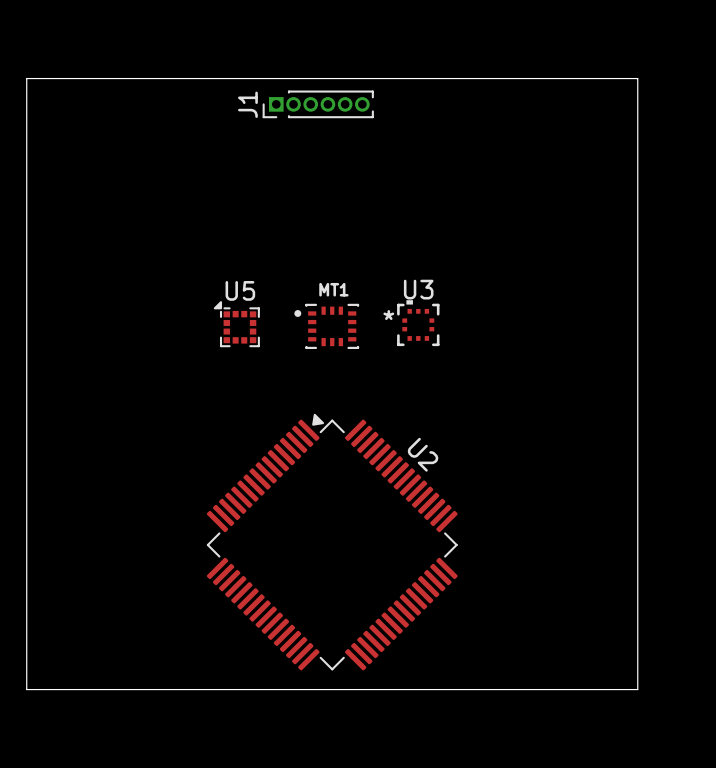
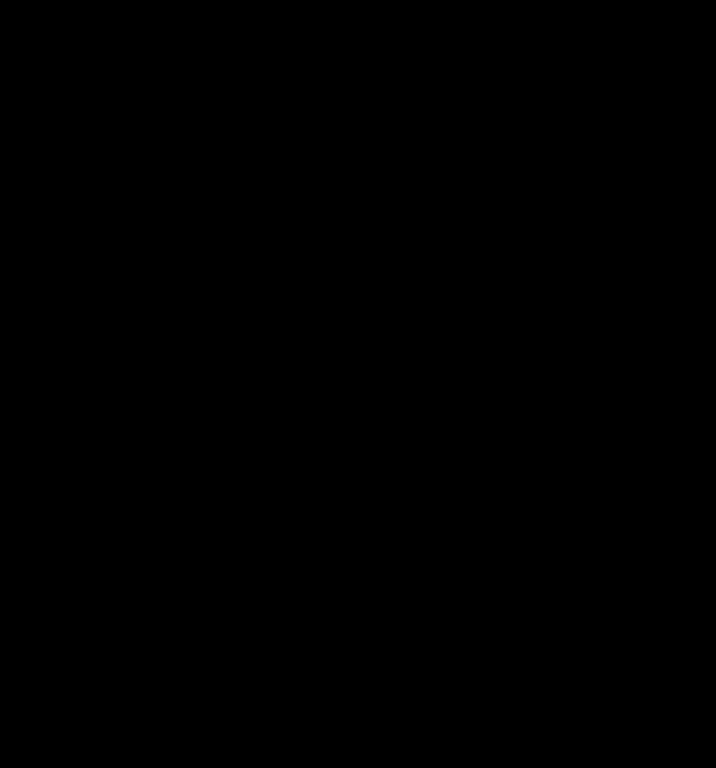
board edge: (26, 78) (637, 78) (637, 689) (26, 689) (26, 78) -> none
J1: (318, 104) -> none
U3: (418, 323) -> none
U5: (236, 324) -> none
MT1: (326, 326) -> none
U2: (332, 542) -> none

